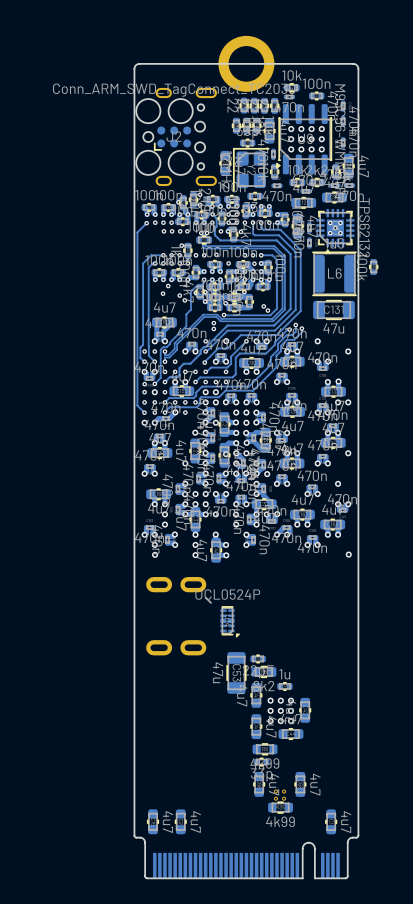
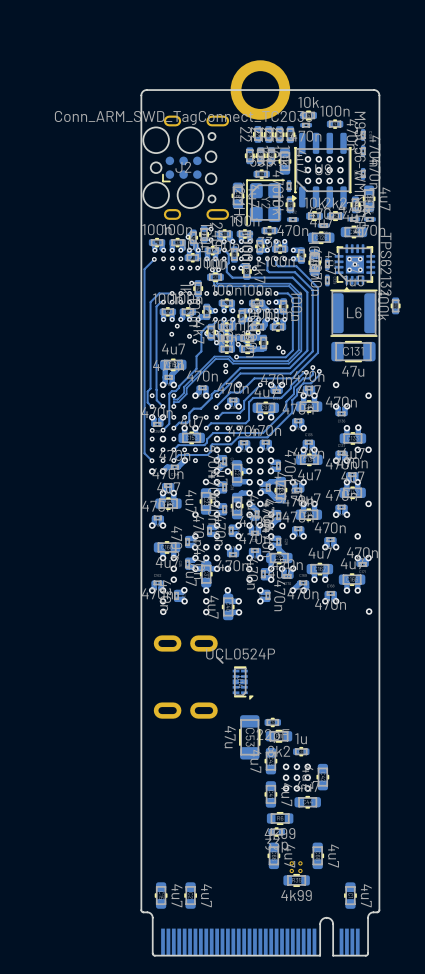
via: (205, 341) -> none

